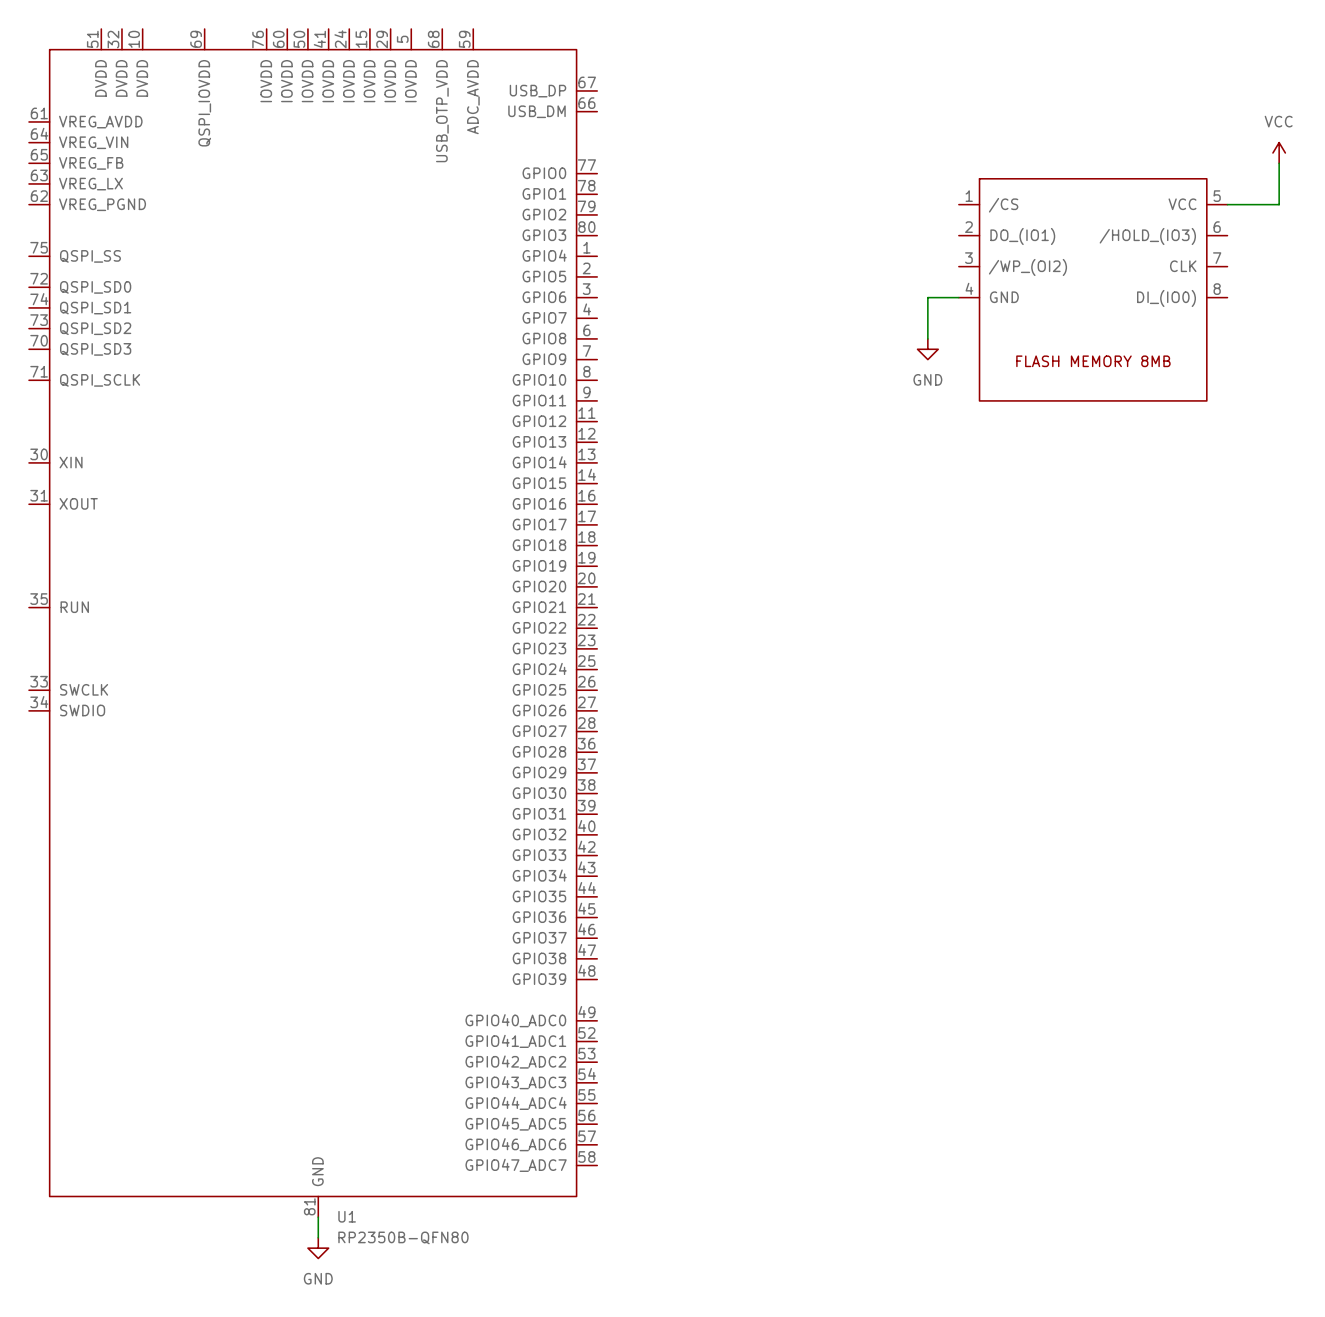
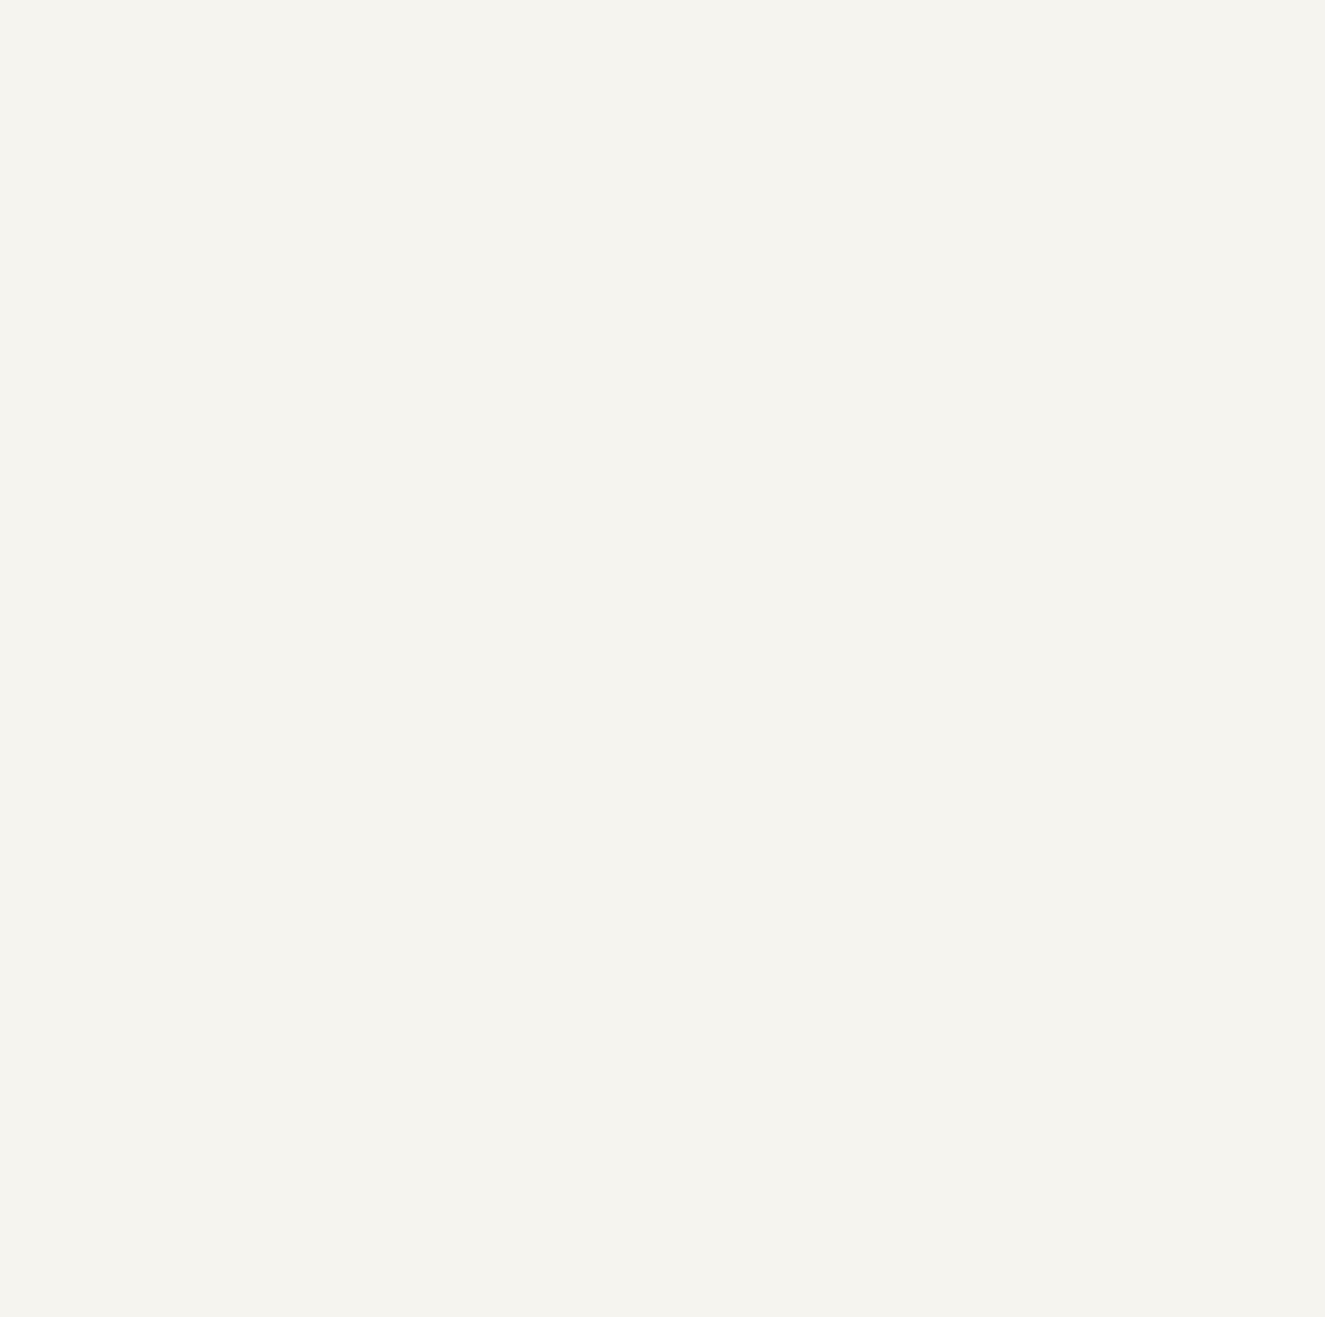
power symbol: VCC (1279, 152) -> none
wire: (1279, 163) (1279, 204) (1227, 204) -> none
wire: (958, 297) (927, 297) (927, 338) -> none
power symbol: GND (927, 349) -> none
U1: RP2350B-QFN80 (628, 623) -> none
wire: (318, 1217) (318, 1237) -> none
power symbol: GND (318, 1248) -> none

